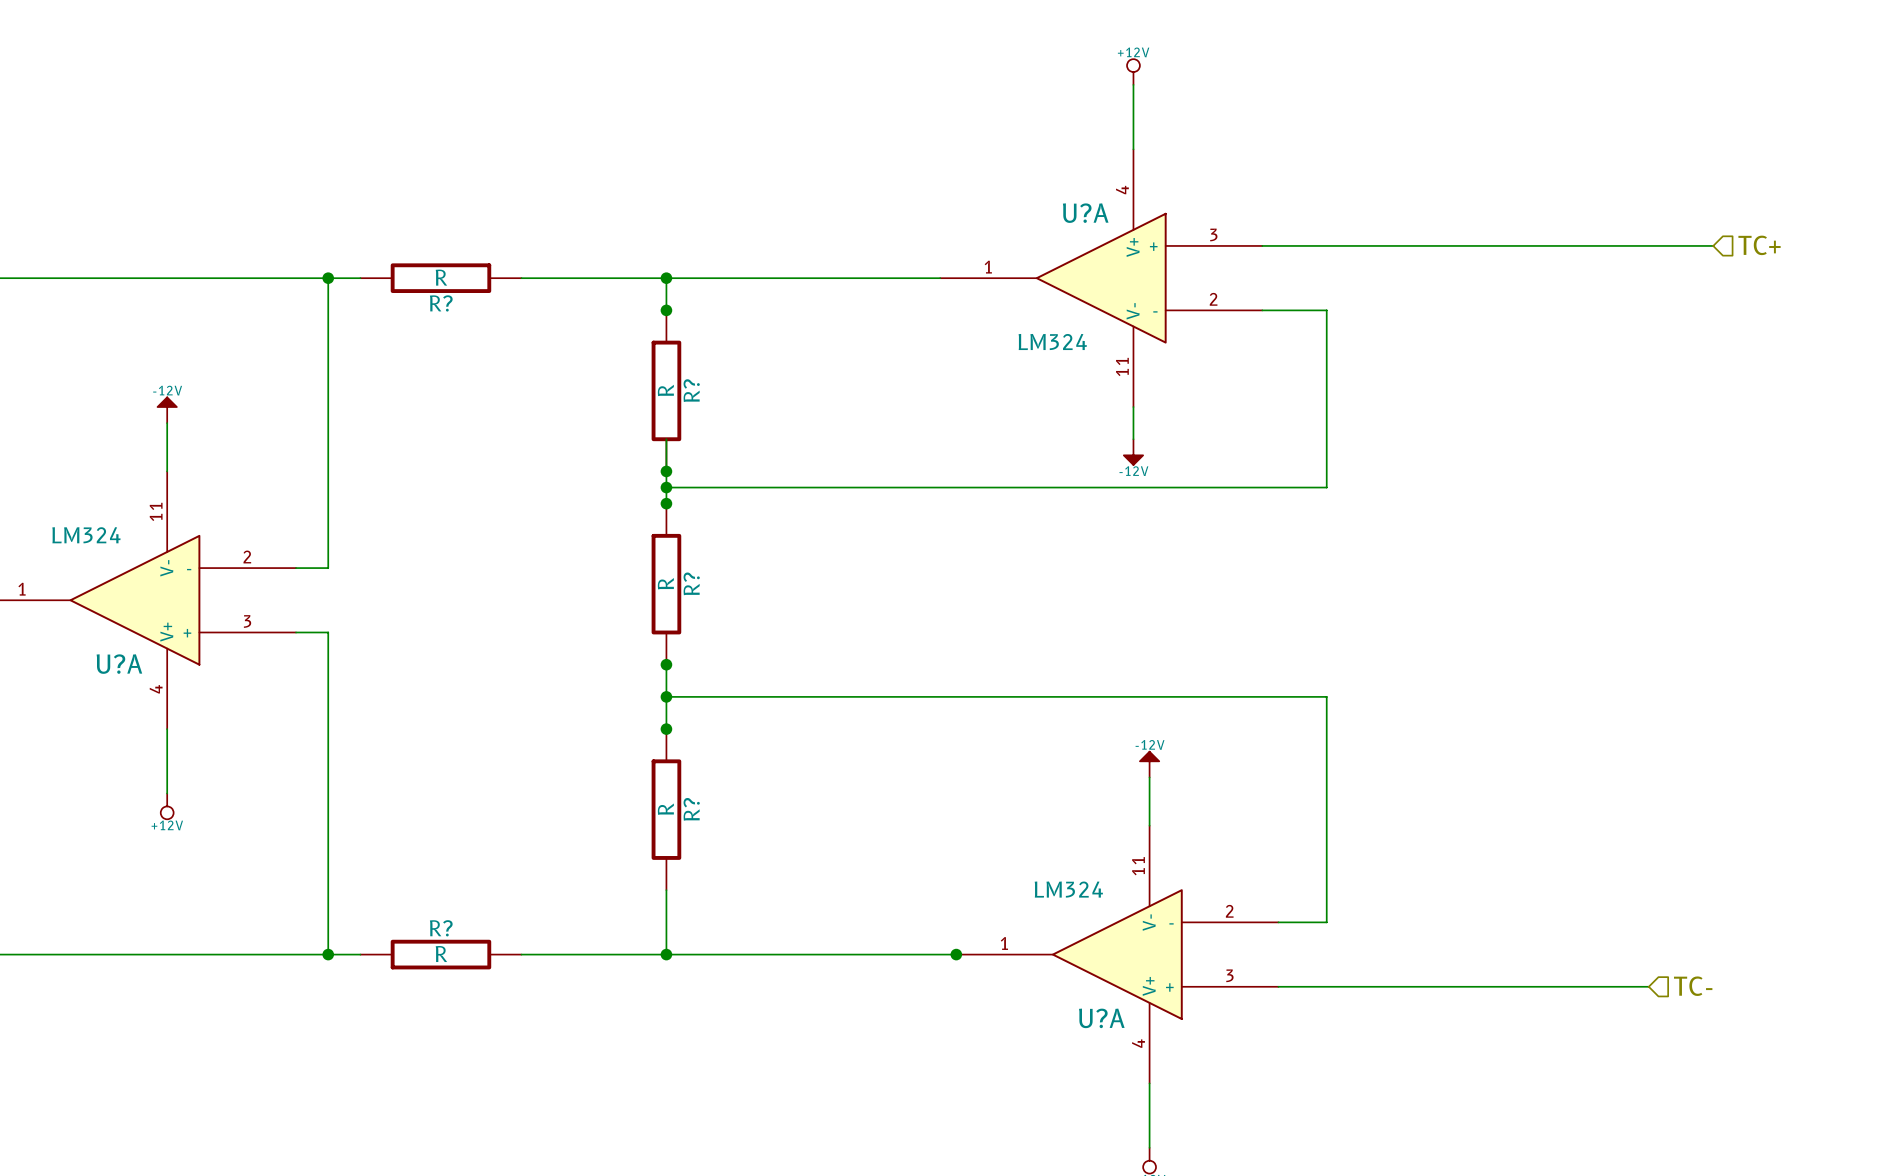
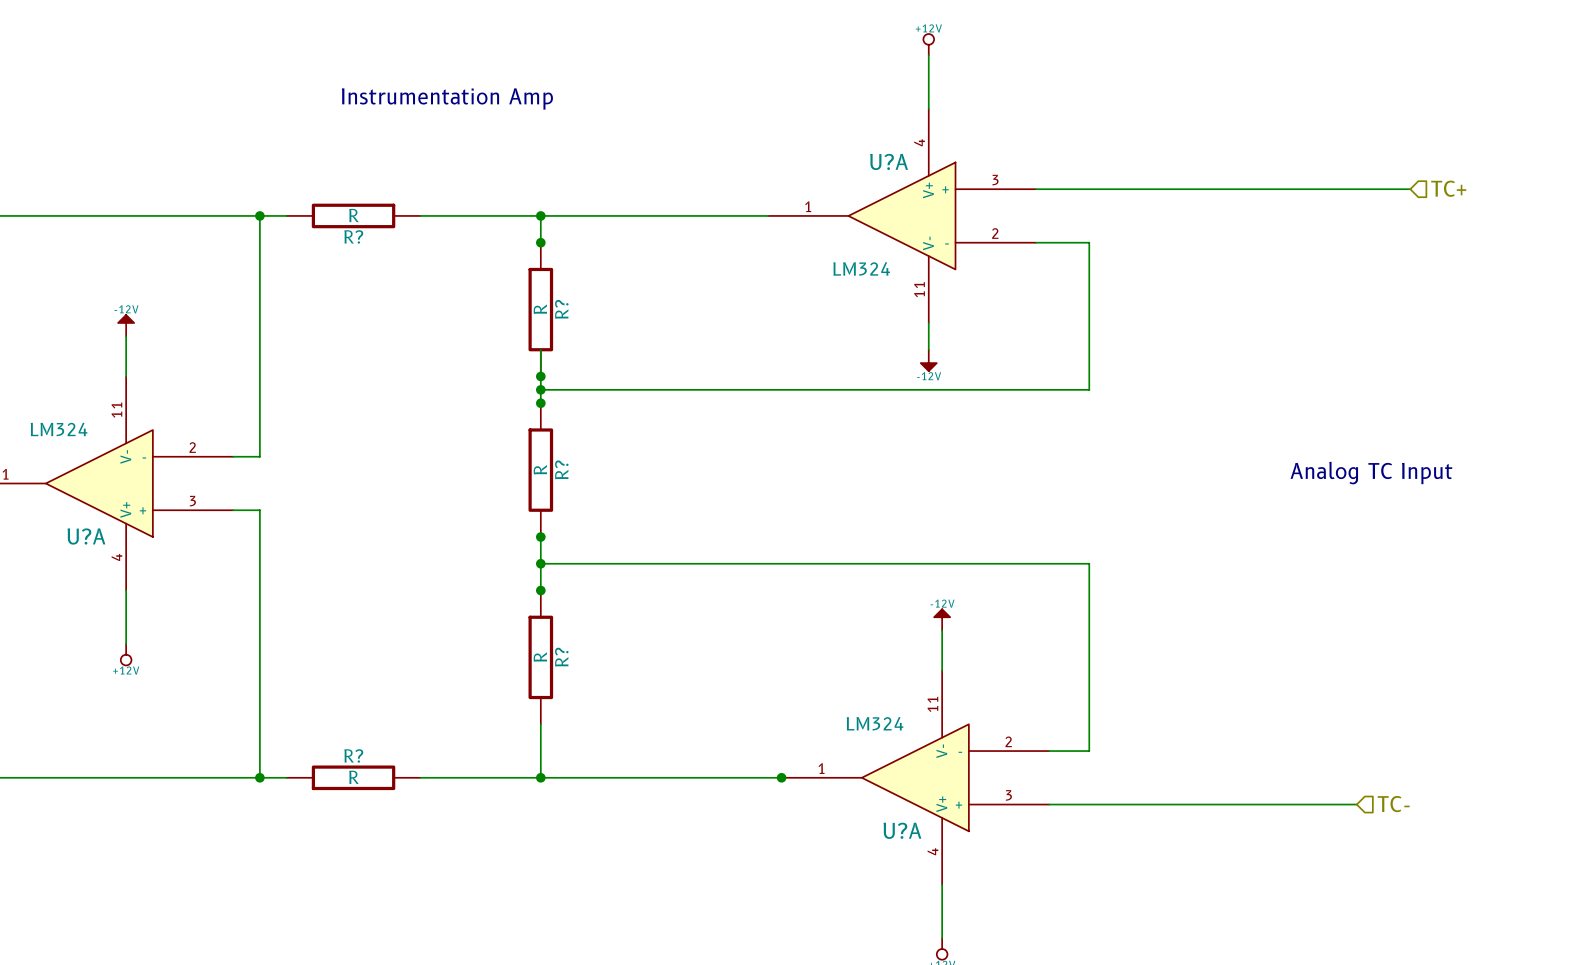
text: none -> Instrumentation Amp (447, 98)
text: none -> Analog TC Input (1371, 473)

